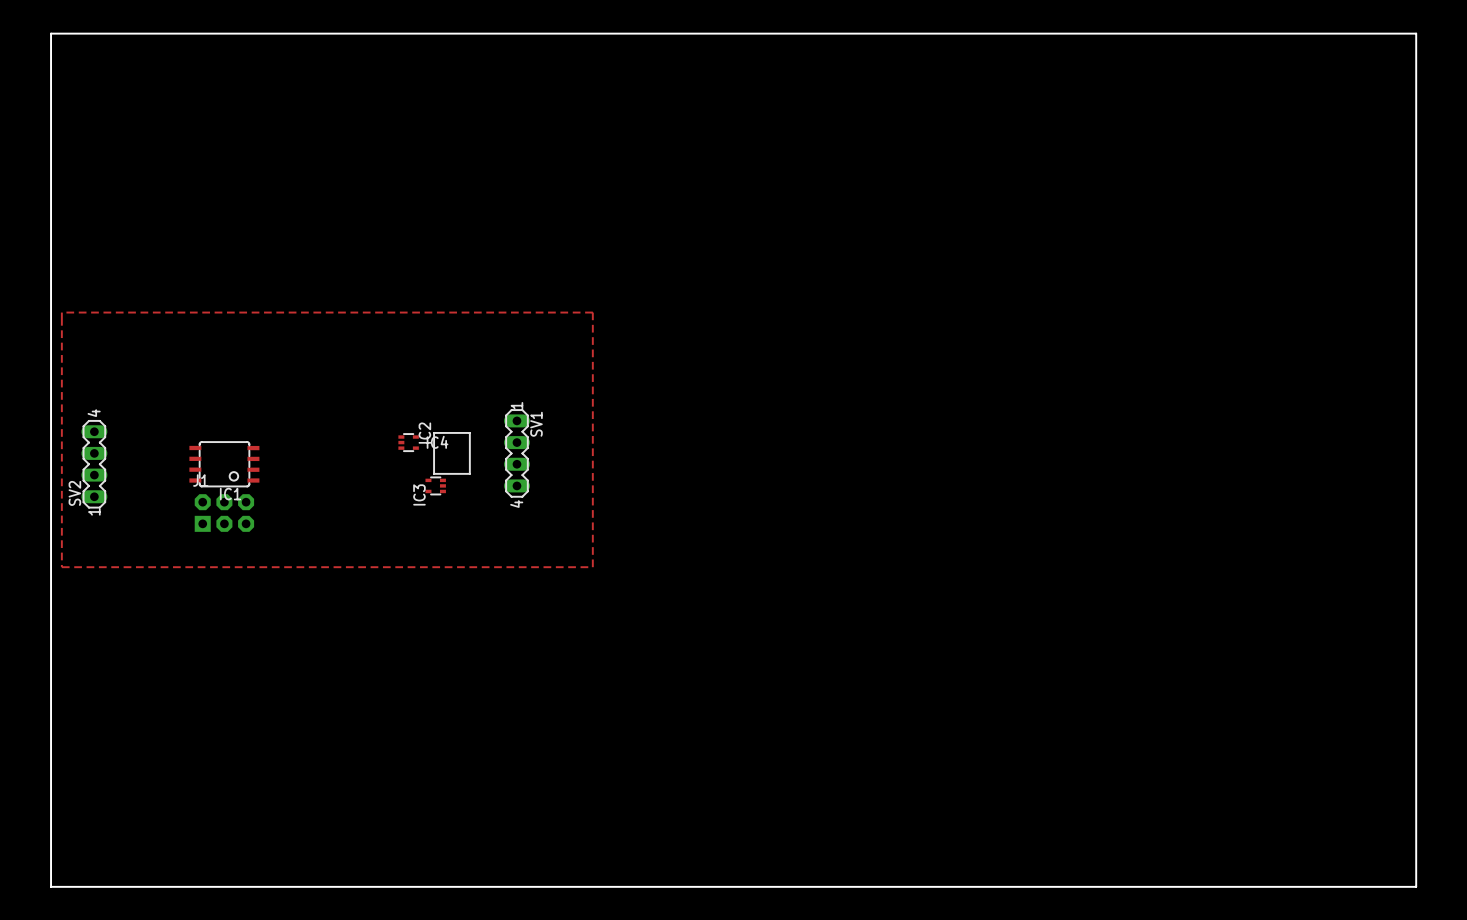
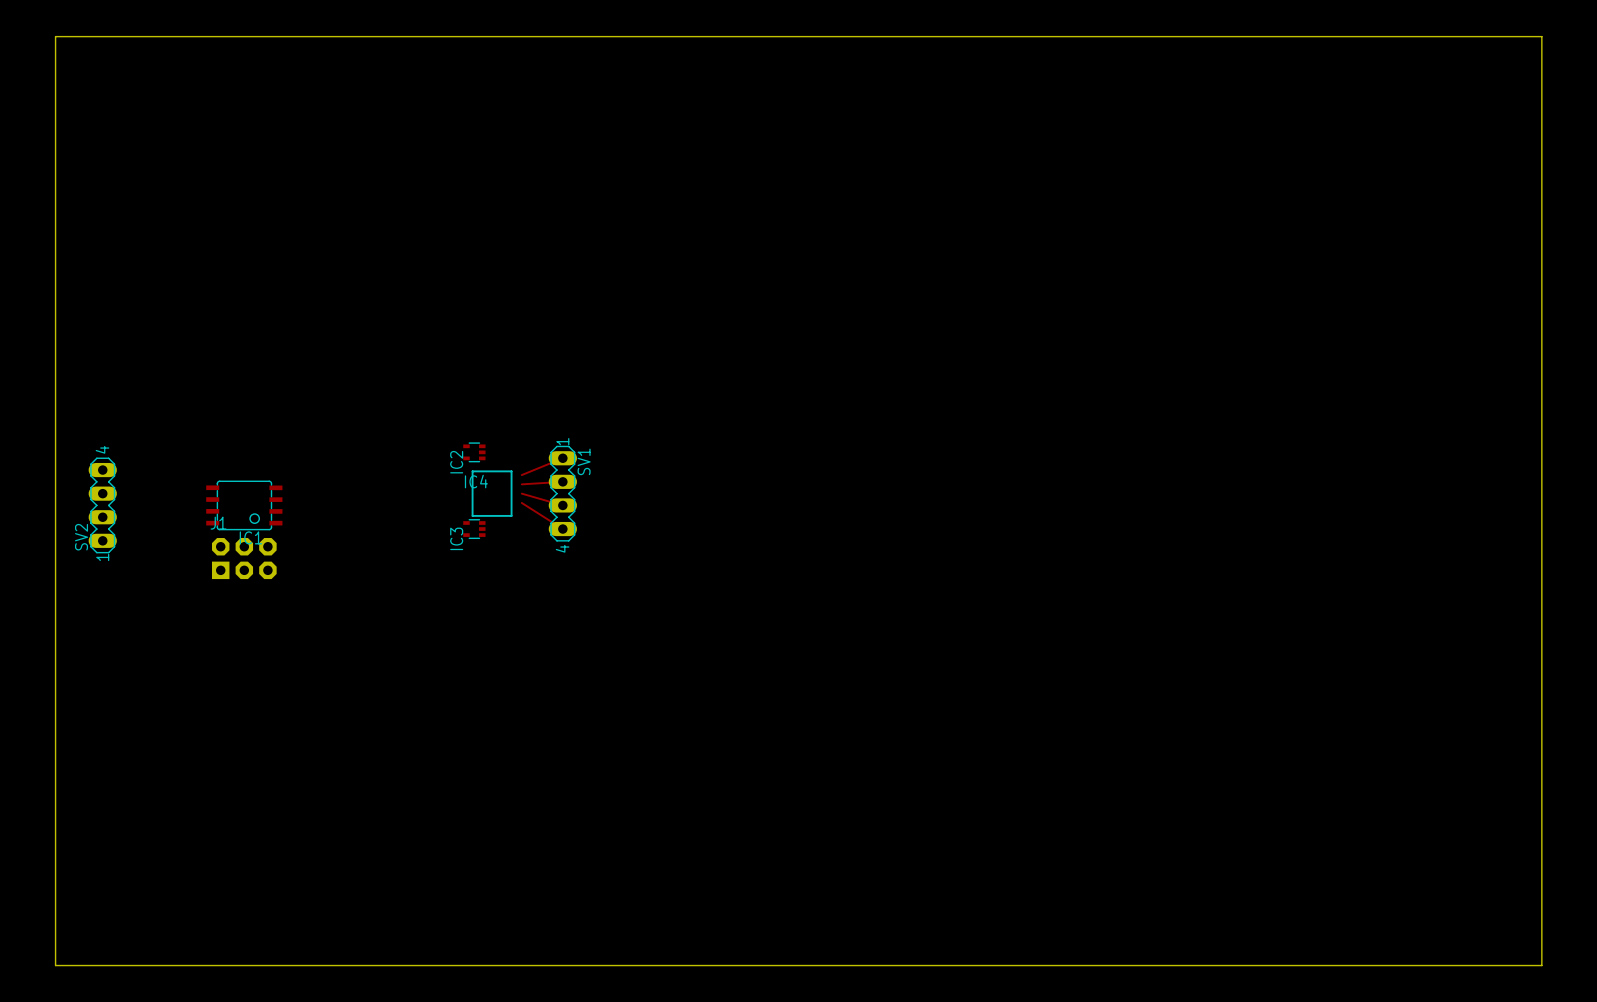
top zone outline: (61, 312) (61, 567) (592, 567) (592, 312) (61, 312) -> none
top track: none -> (562, 458) (521, 475)
IC2 rotation: 0° (408, 442) -> 180° (474, 452)
IC2 position: (408, 442) -> (474, 452)
top track: none -> (562, 481) (521, 484)
top track: none -> (521, 493) (562, 505)
top track: none -> (521, 502) (562, 529)

